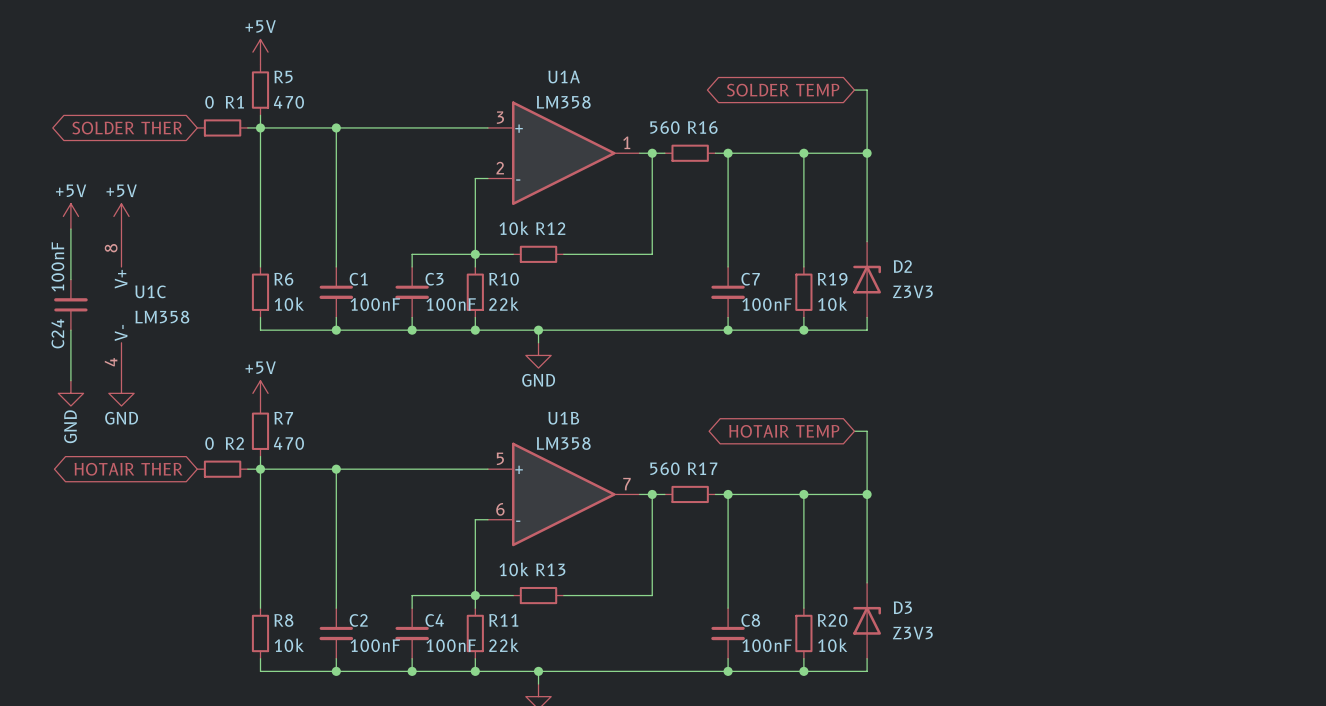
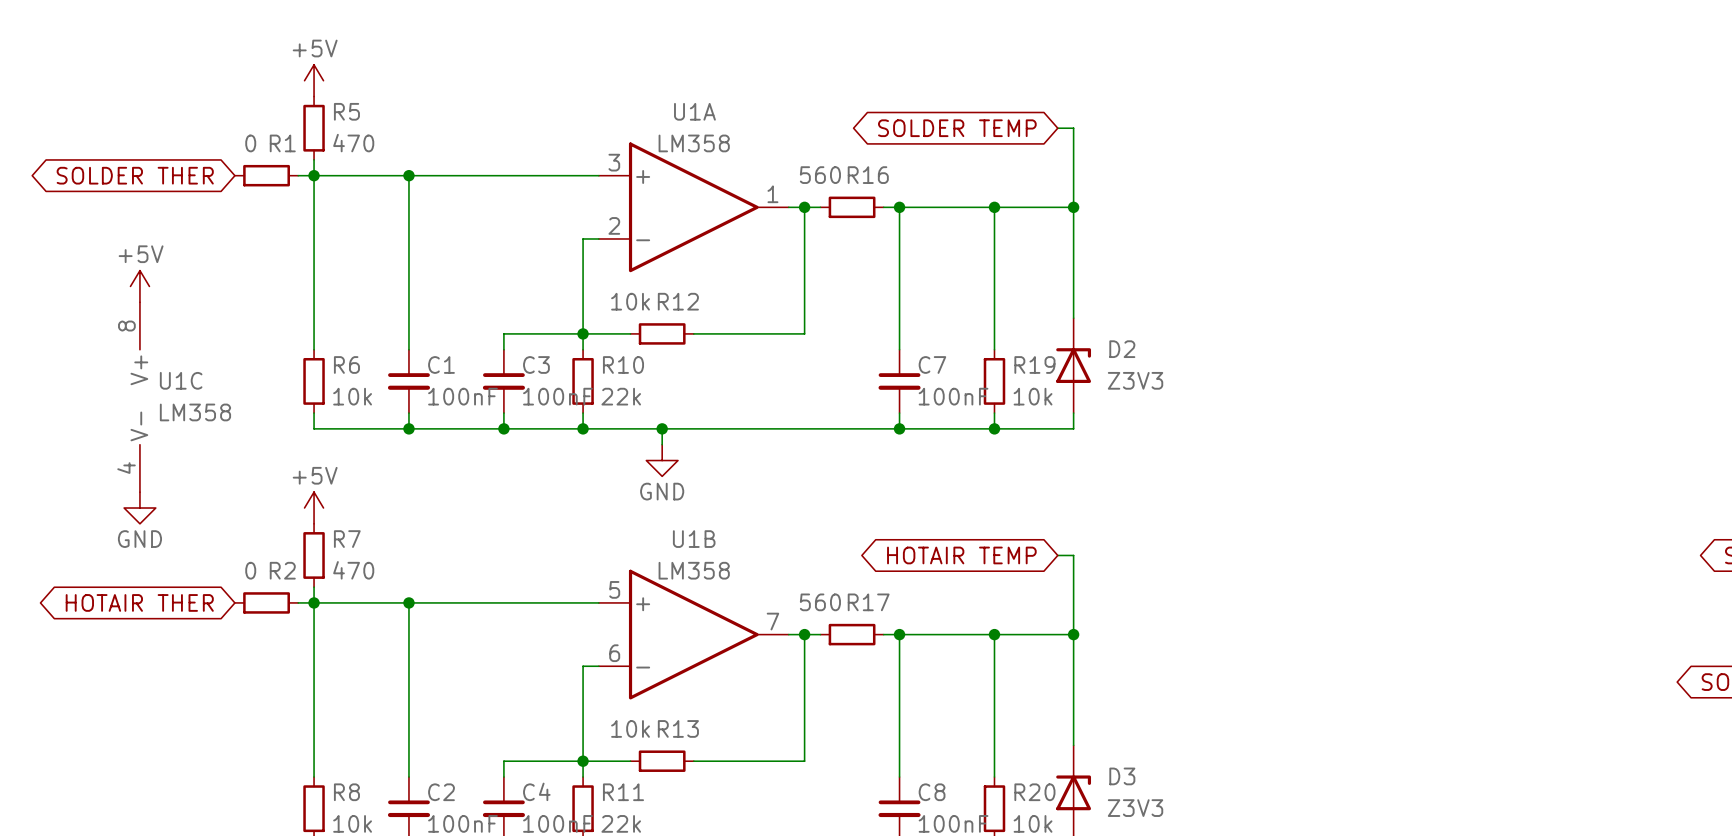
power symbol: +5V (70, 216) -> none
wire: (70, 229) (70, 279) -> none
C24: 100nF (70, 304) -> none
wire: (70, 330) (70, 380) -> none
power symbol: GND (70, 393) -> none

